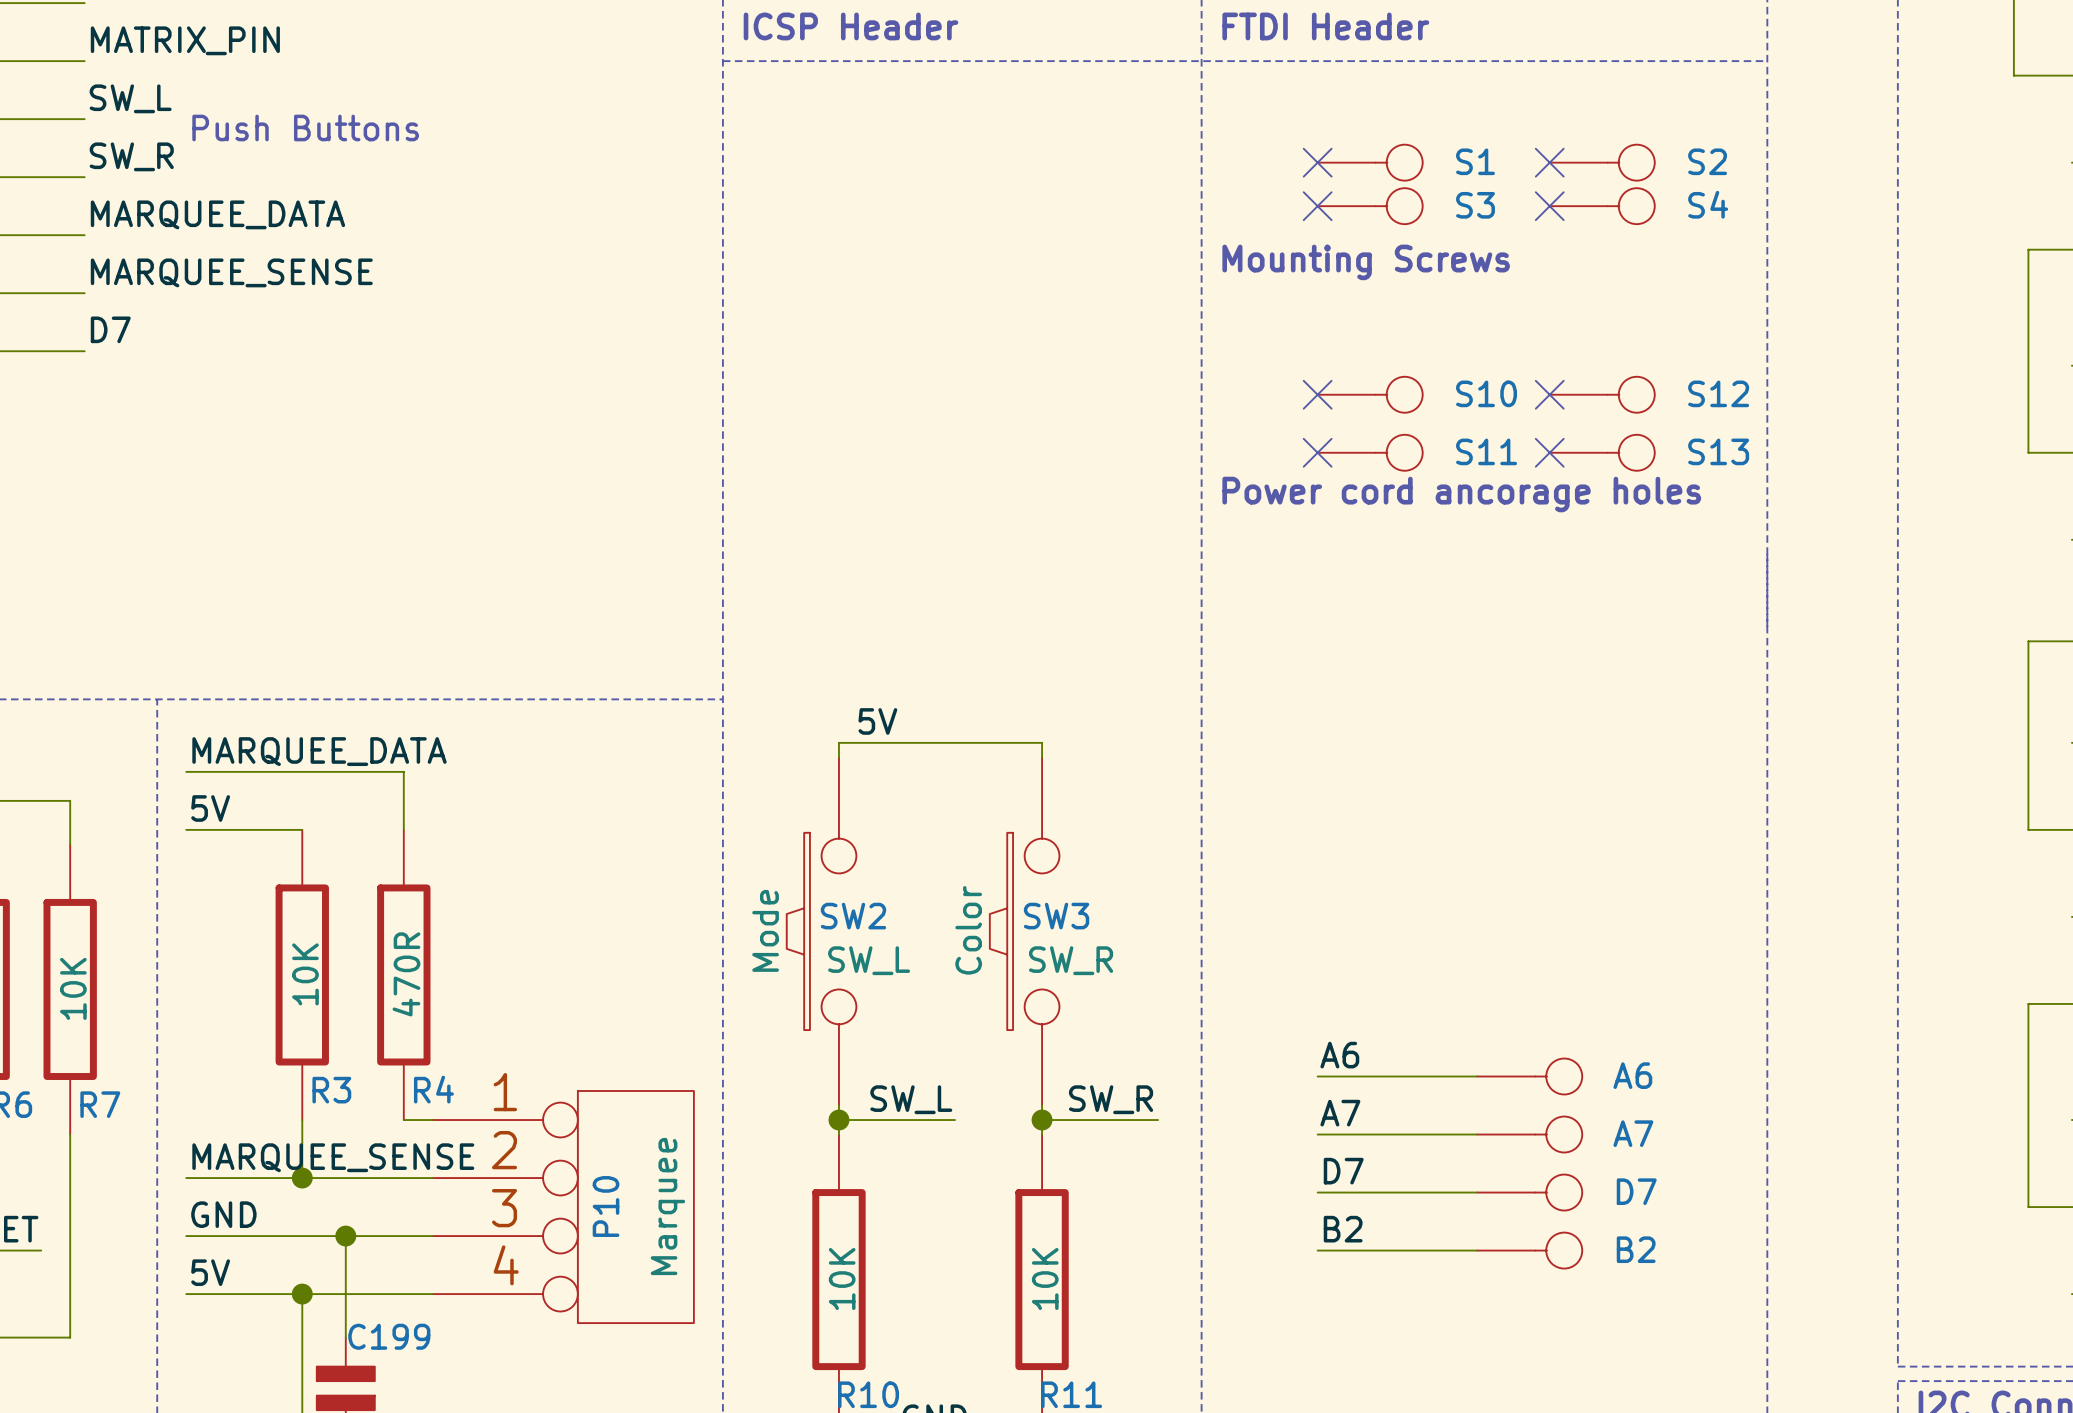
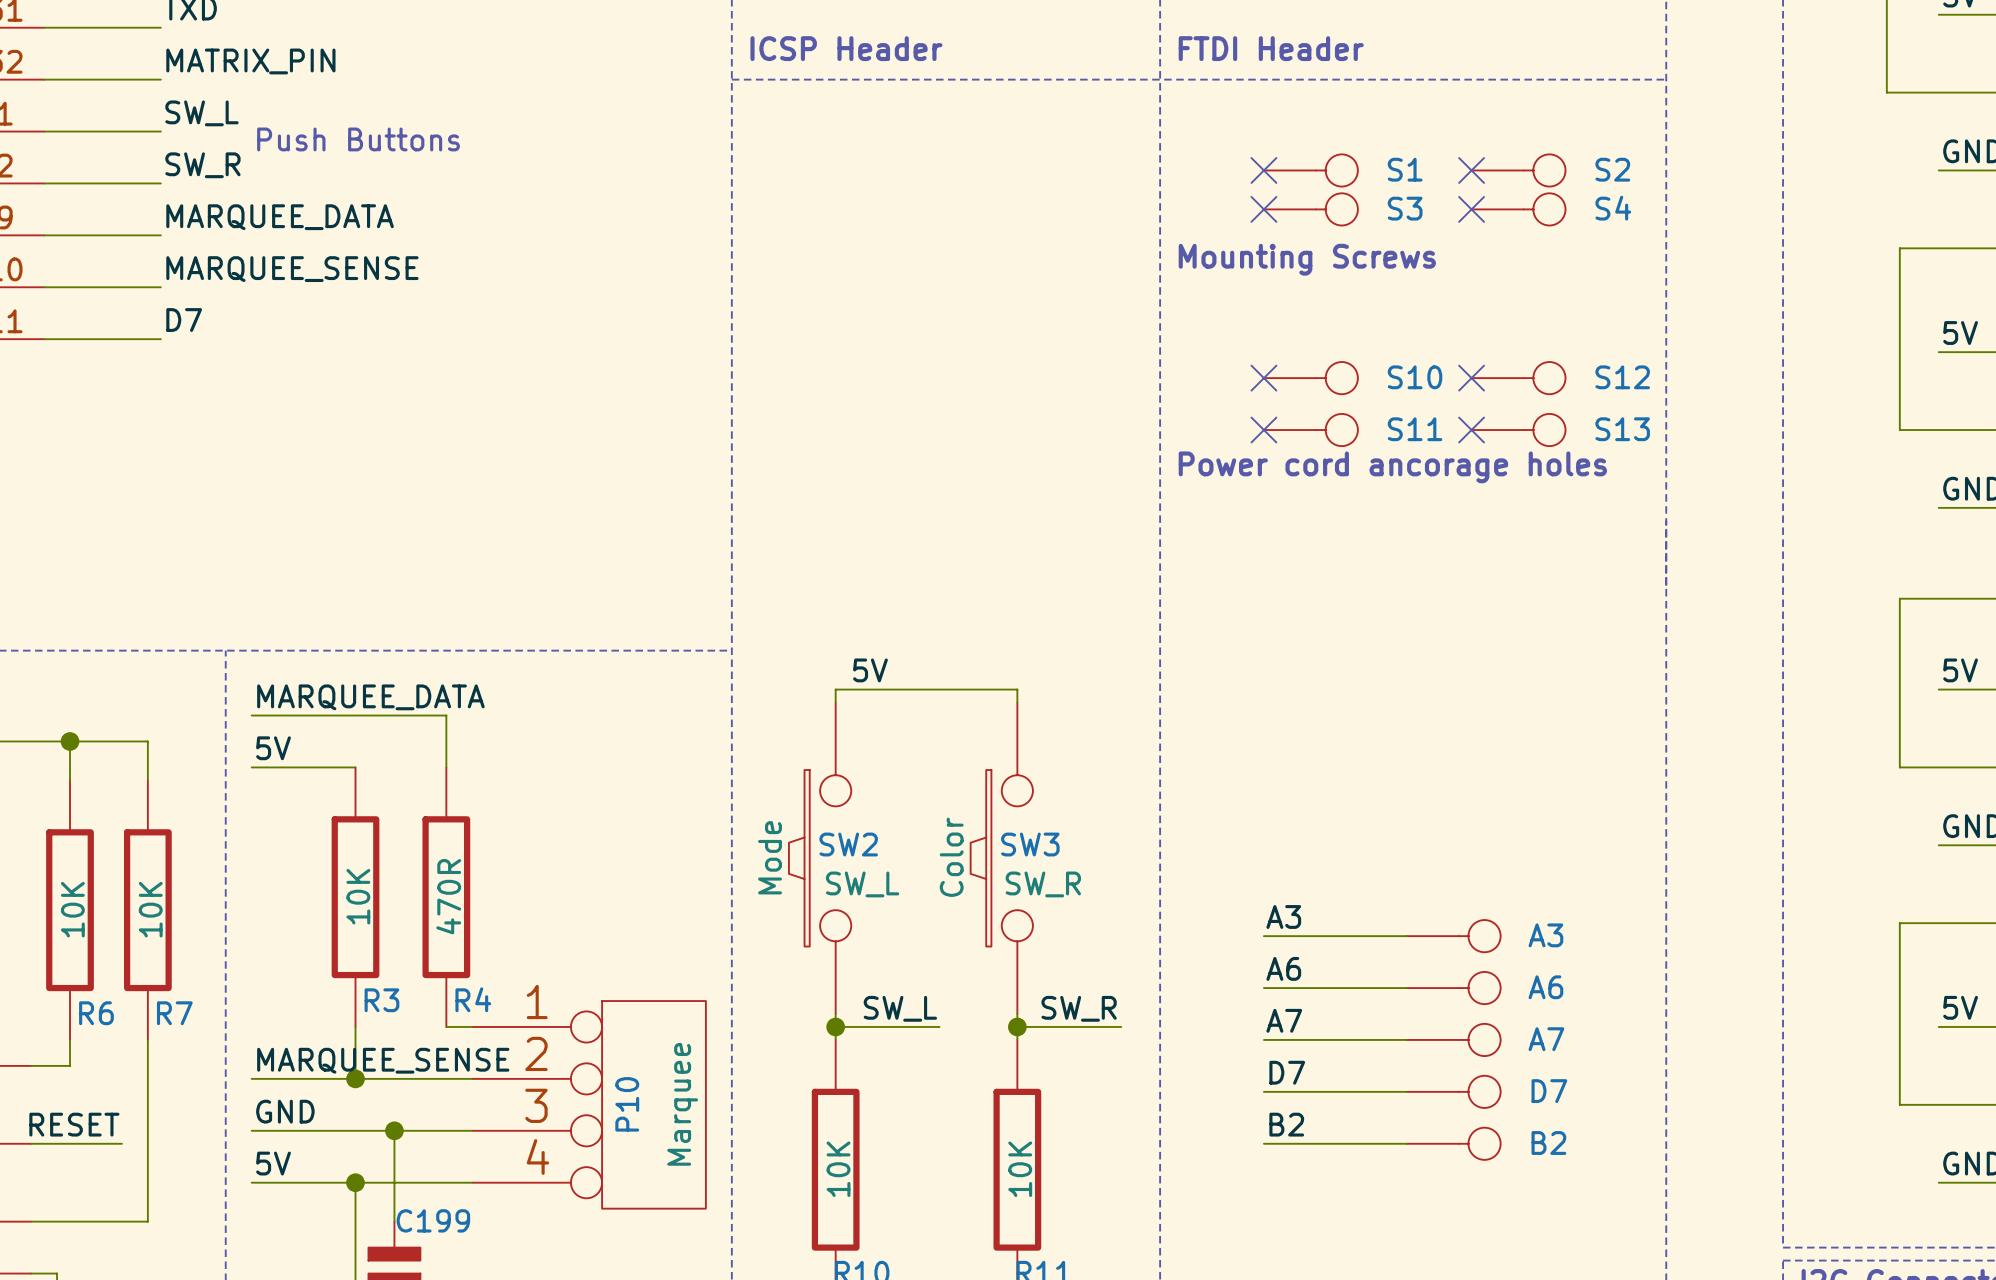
label: none -> A3 (1283, 916)
wire: none -> (1263, 936) (1406, 936)
A3: none -> (1453, 936)

